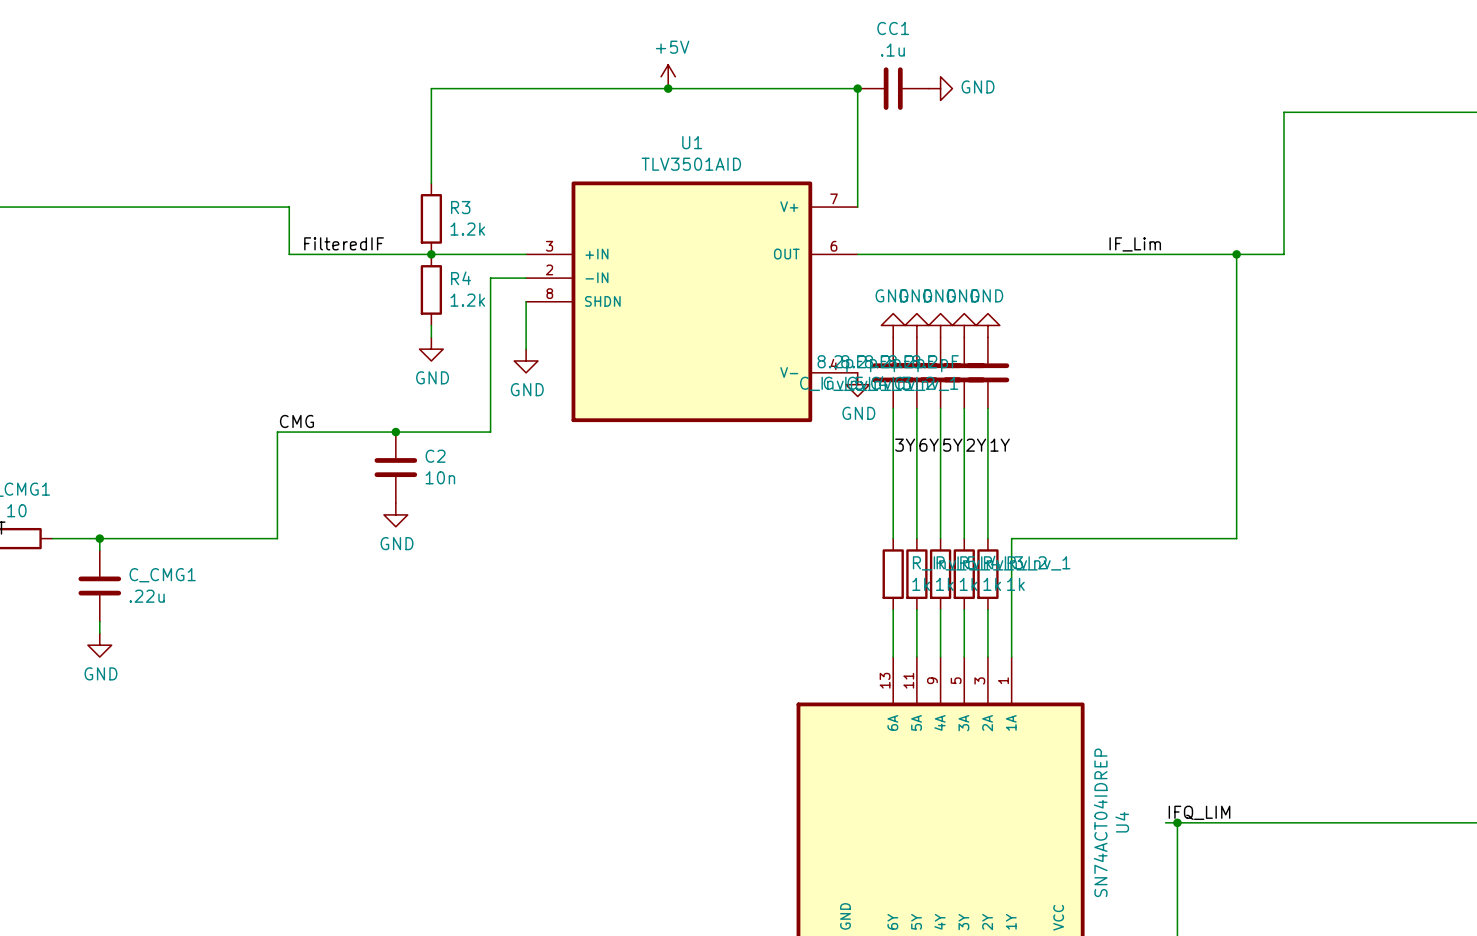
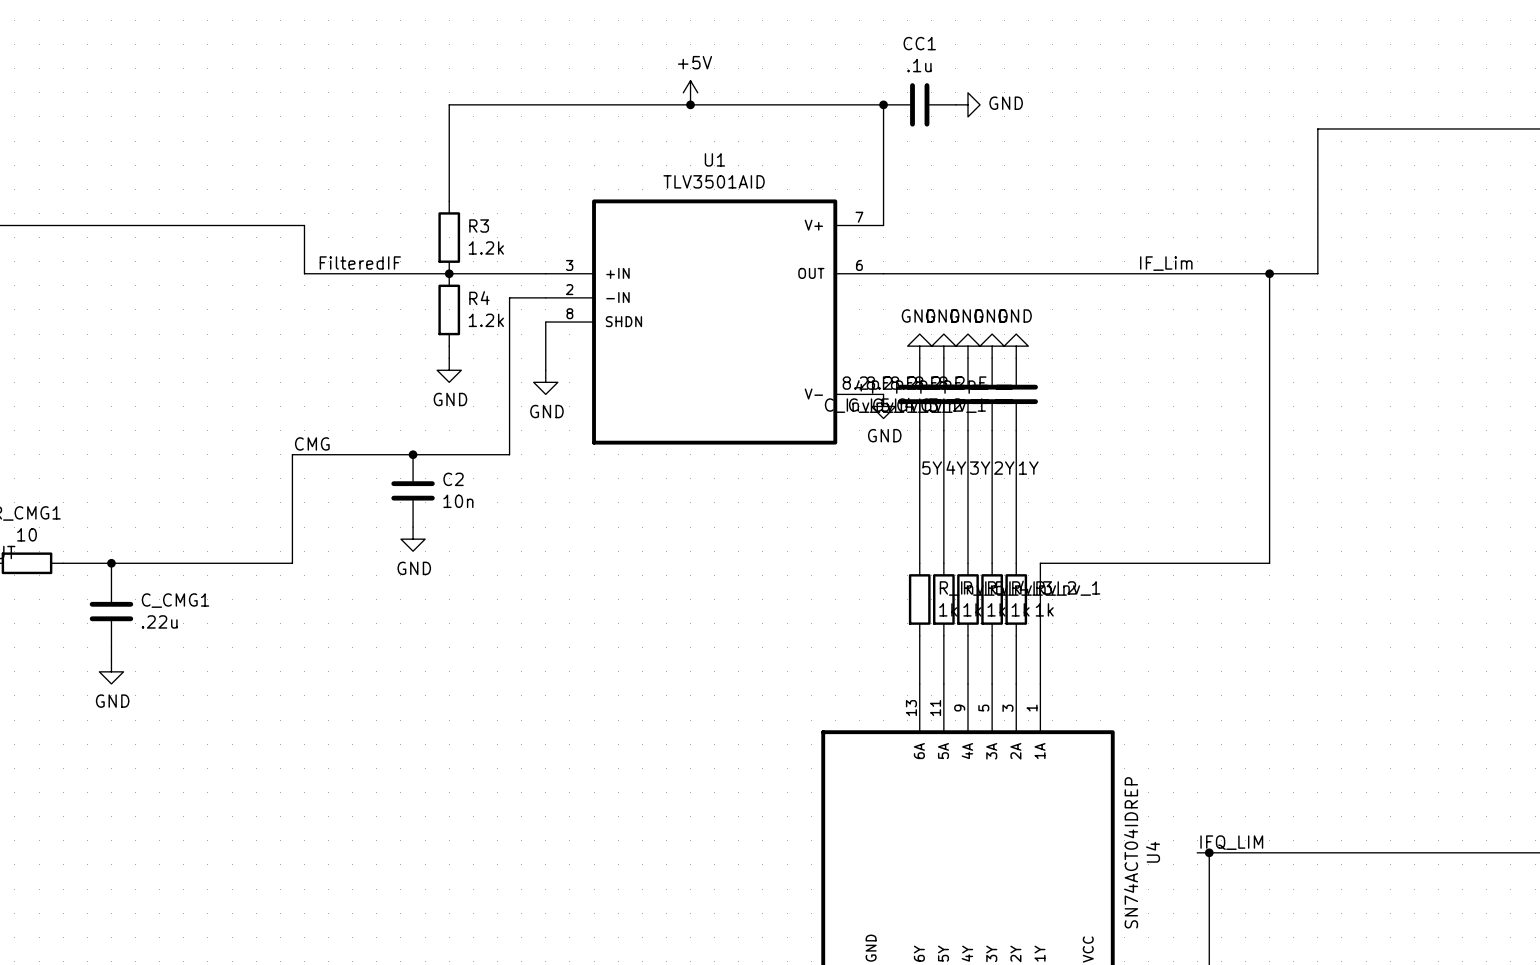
label: 3Y (905, 445) -> 5Y (932, 468)
label: 6Y (929, 445) -> 4Y (956, 467)
label: 5Y (952, 445) -> 3Y (980, 468)

